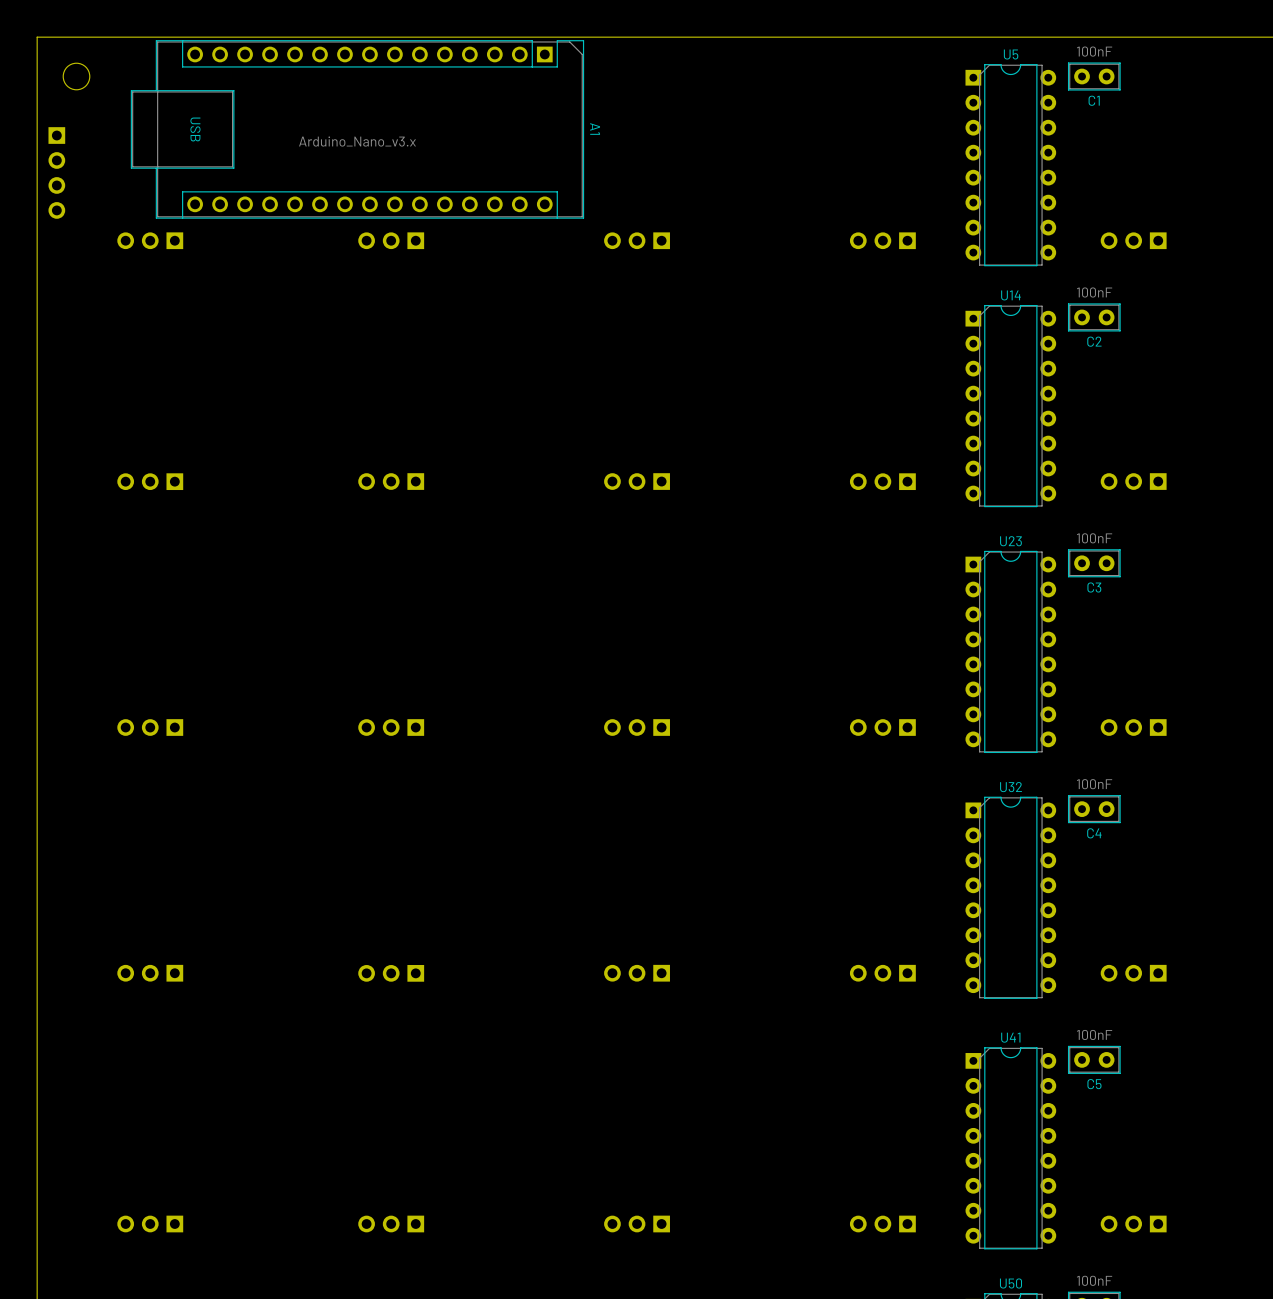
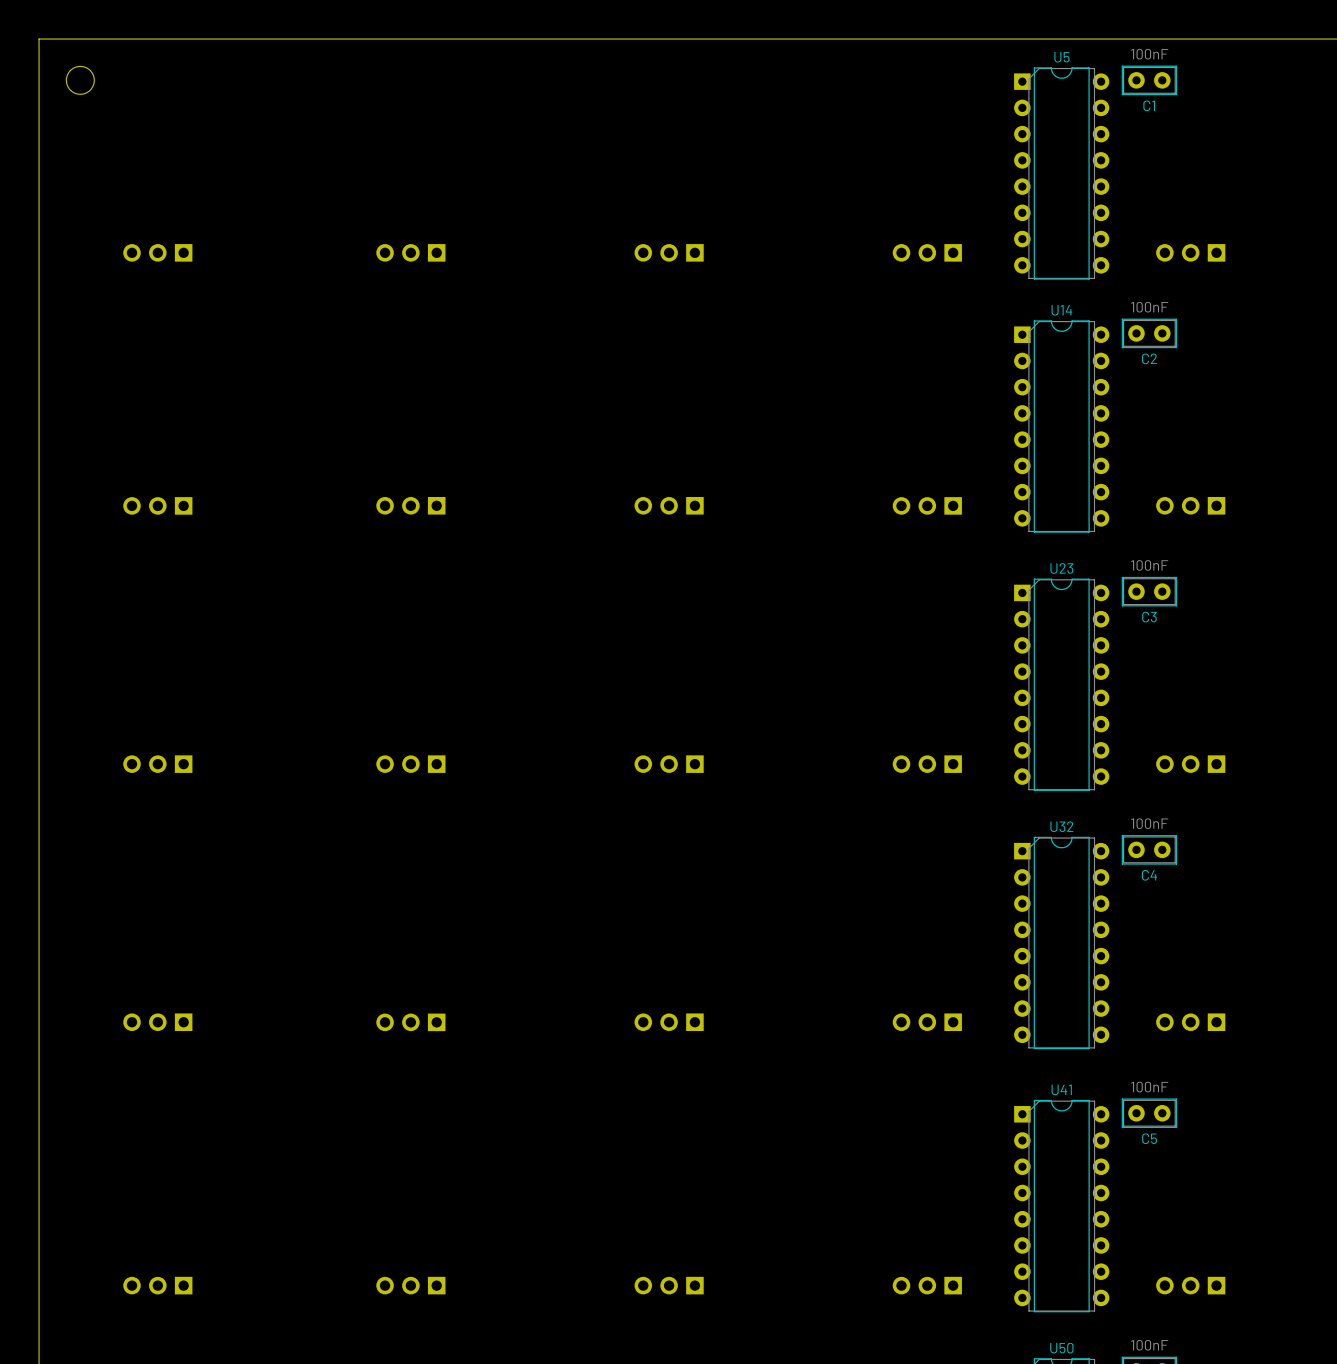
A1: Arduino_Nano_v3.x (357, 129) -> none
part: (56, 172) -> none

